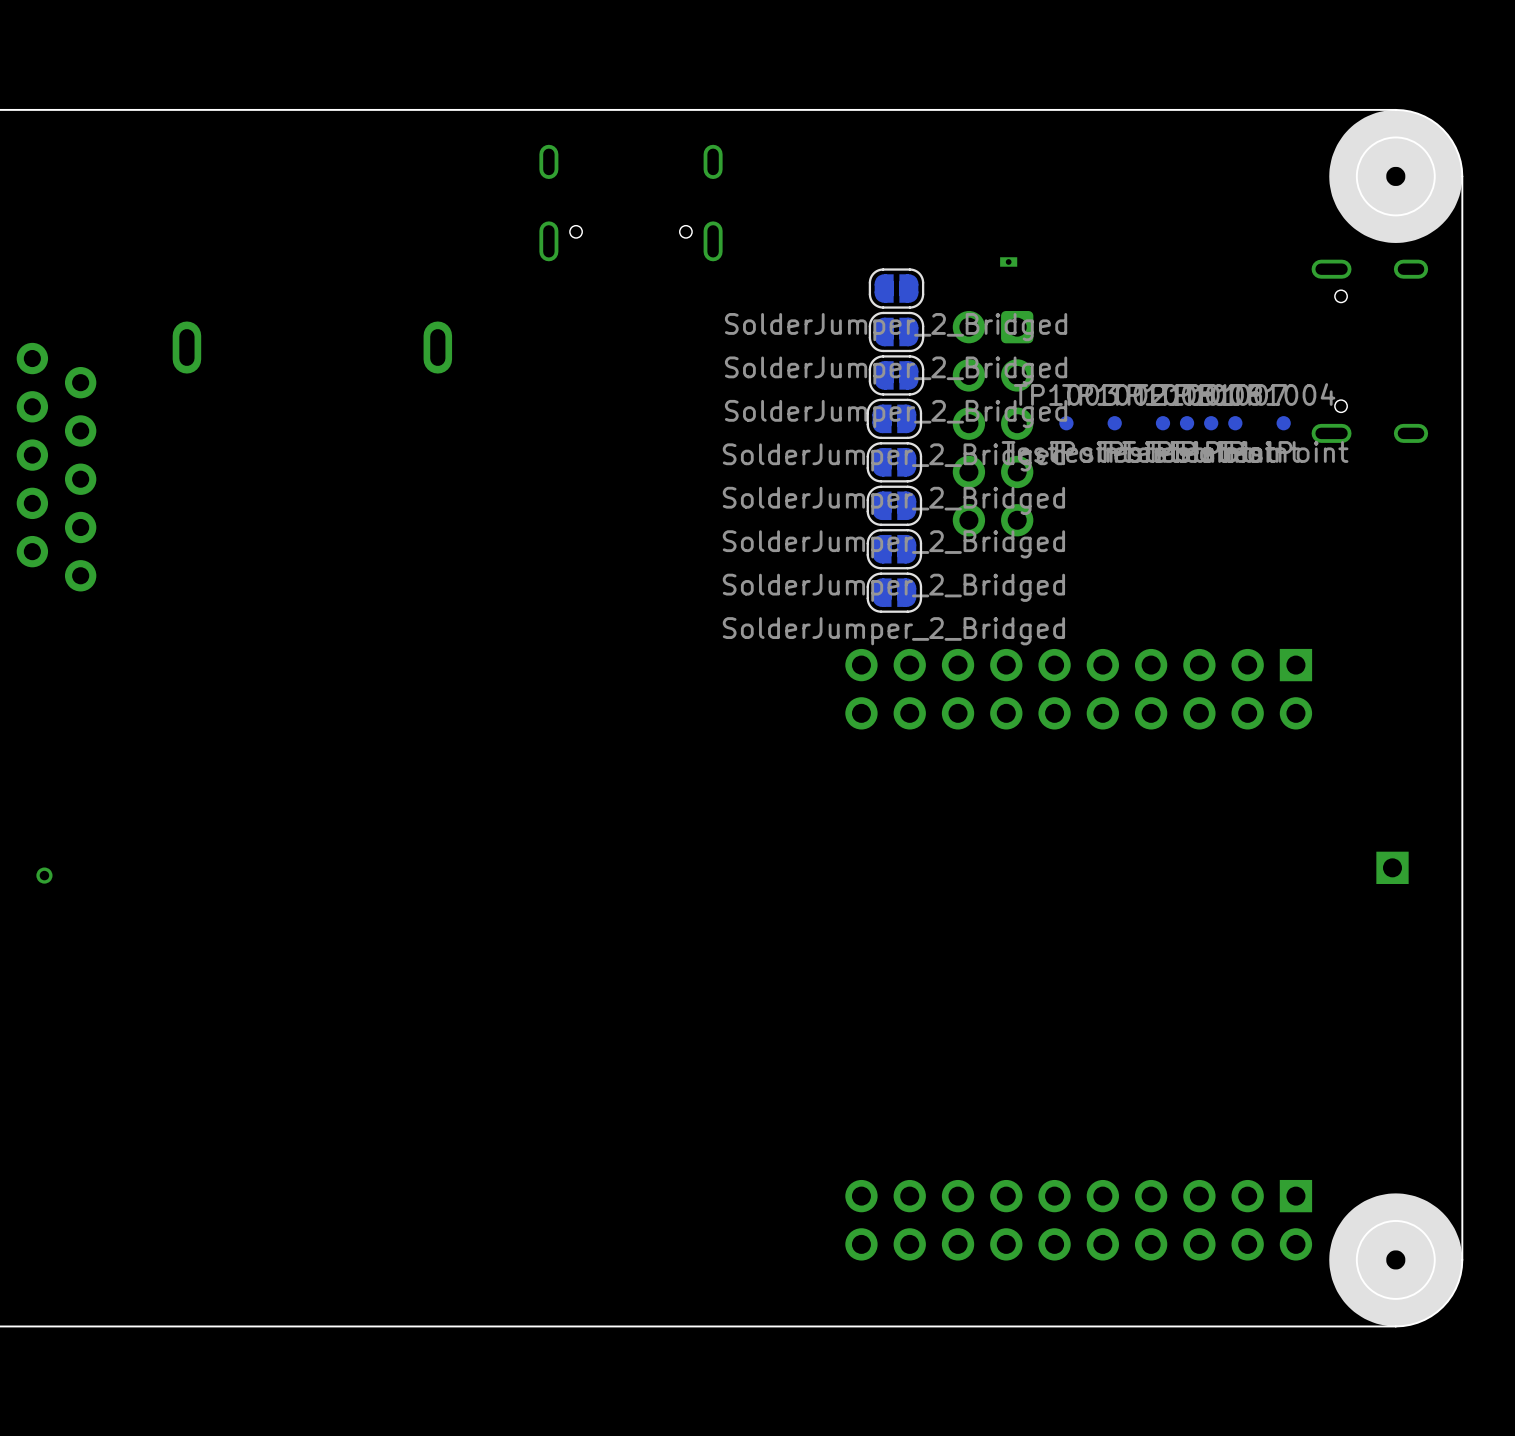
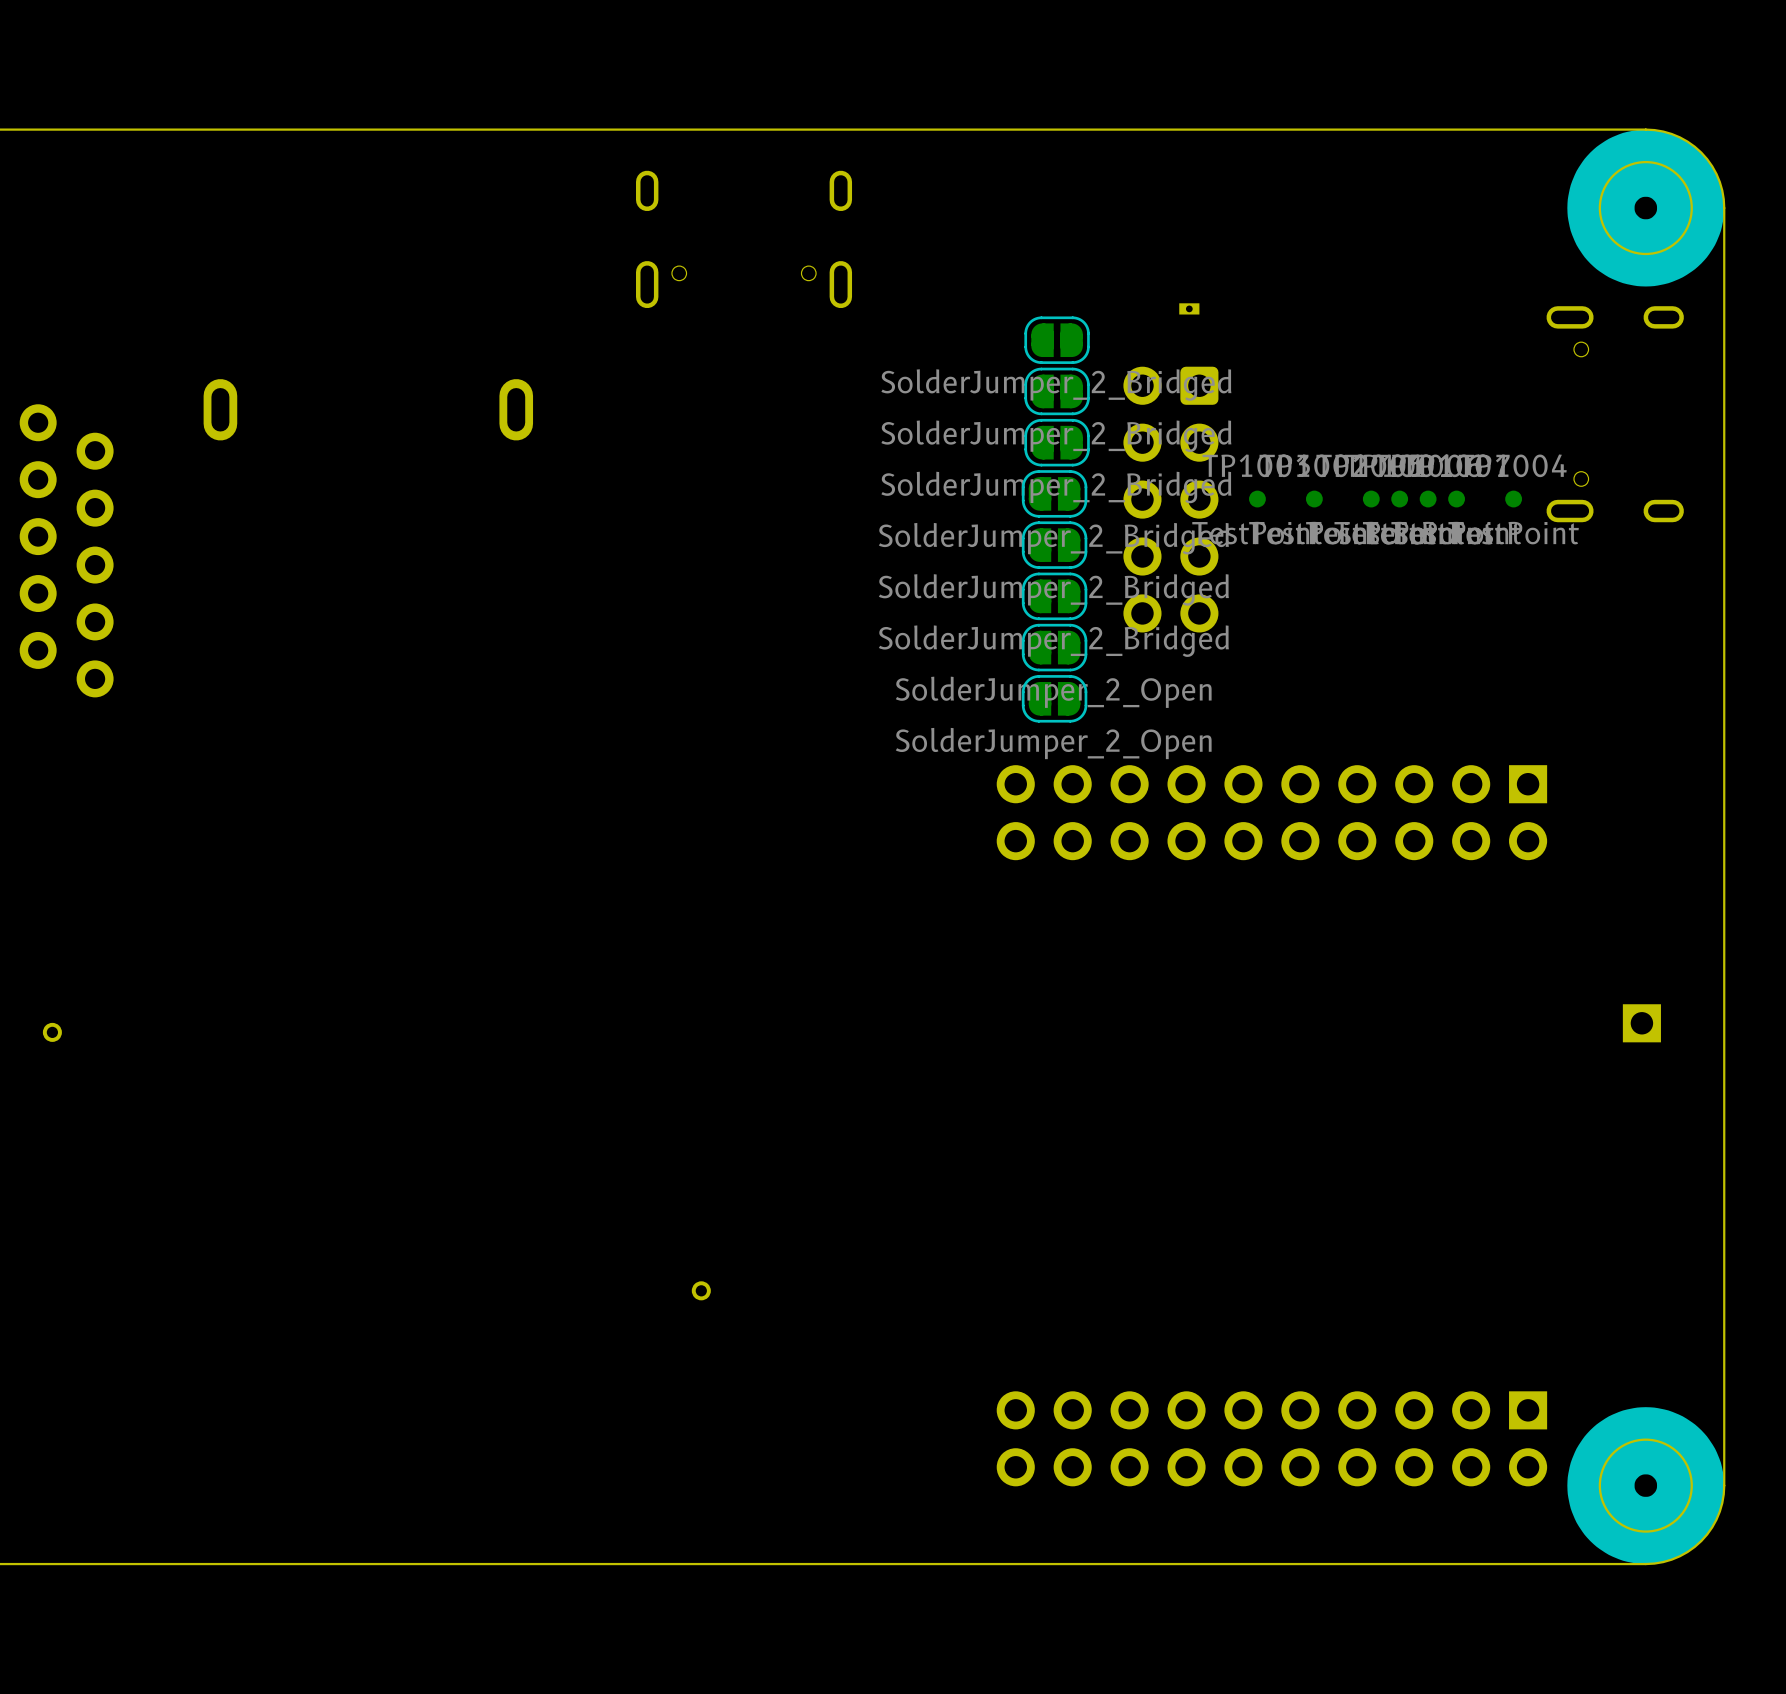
part value: SolderJumper_2_Bridged (893, 587) -> SolderJumper_2_Open (1053, 692)
part value: SolderJumper_2_Bridged (893, 631) -> SolderJumper_2_Open (1053, 743)
part: none -> (701, 1290)

